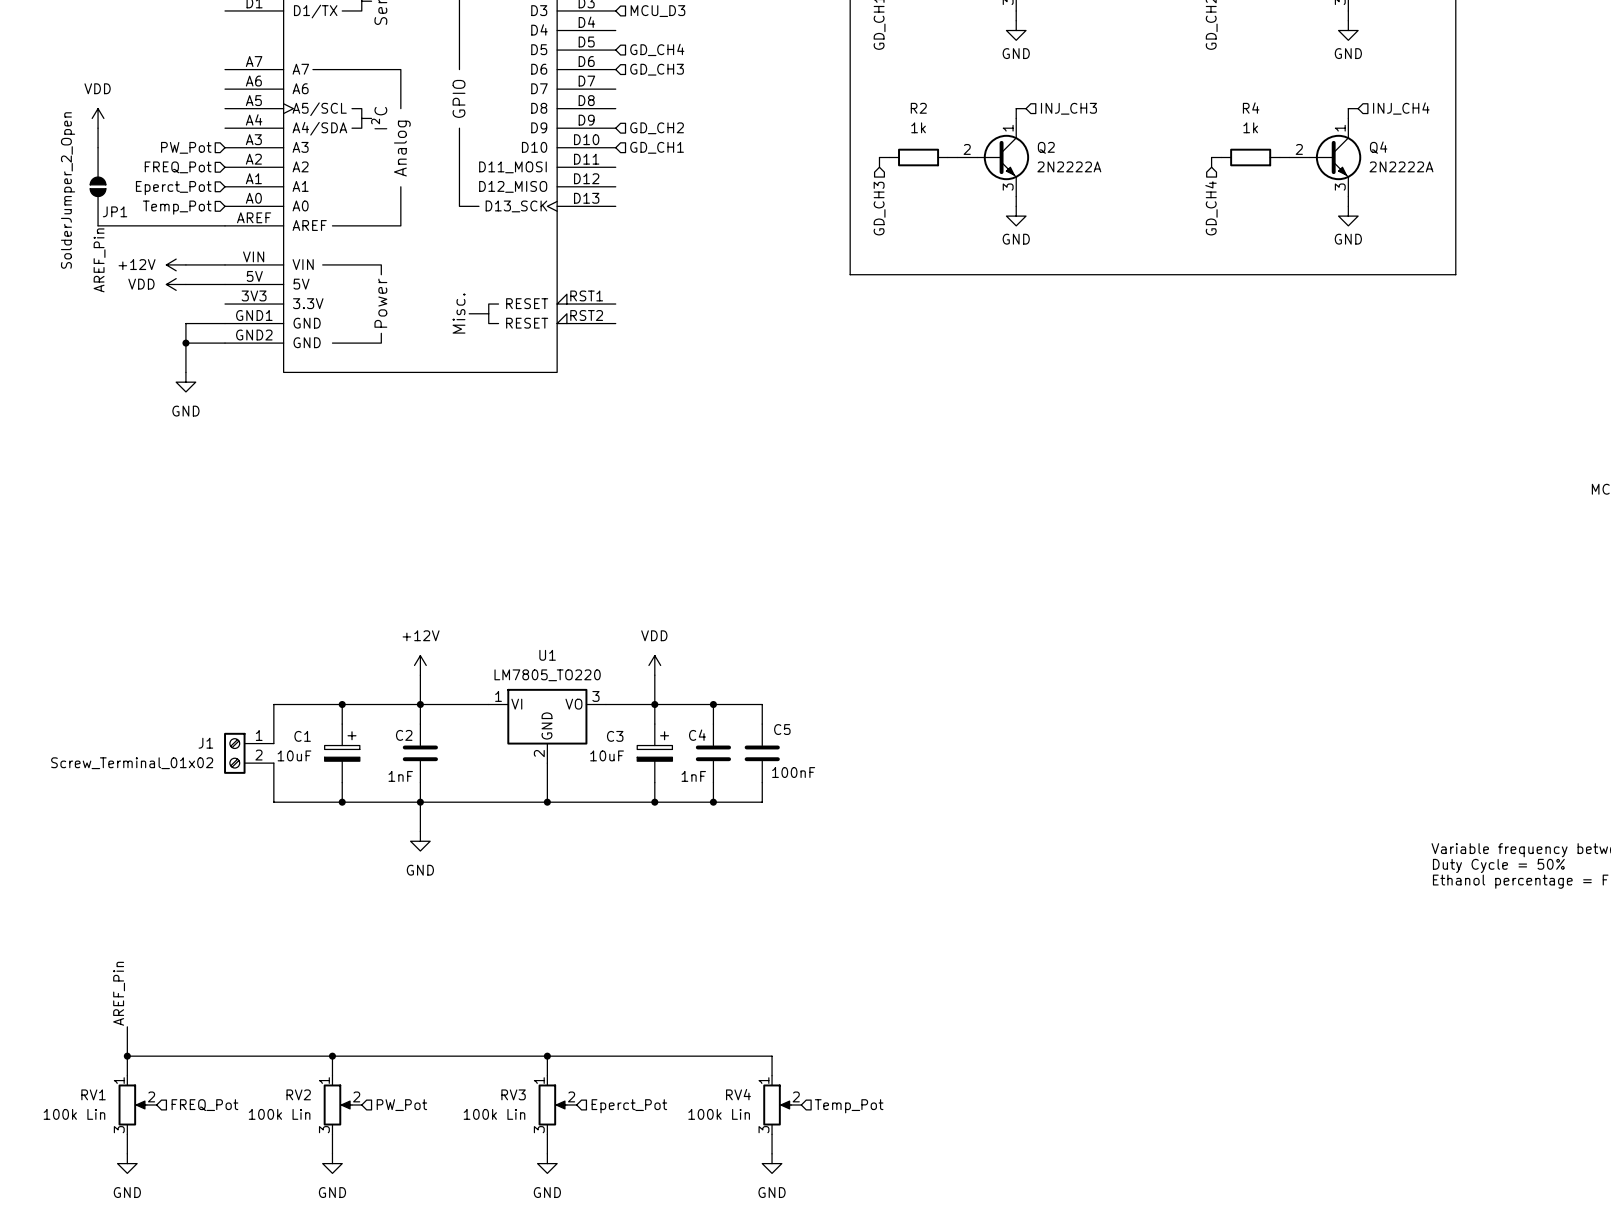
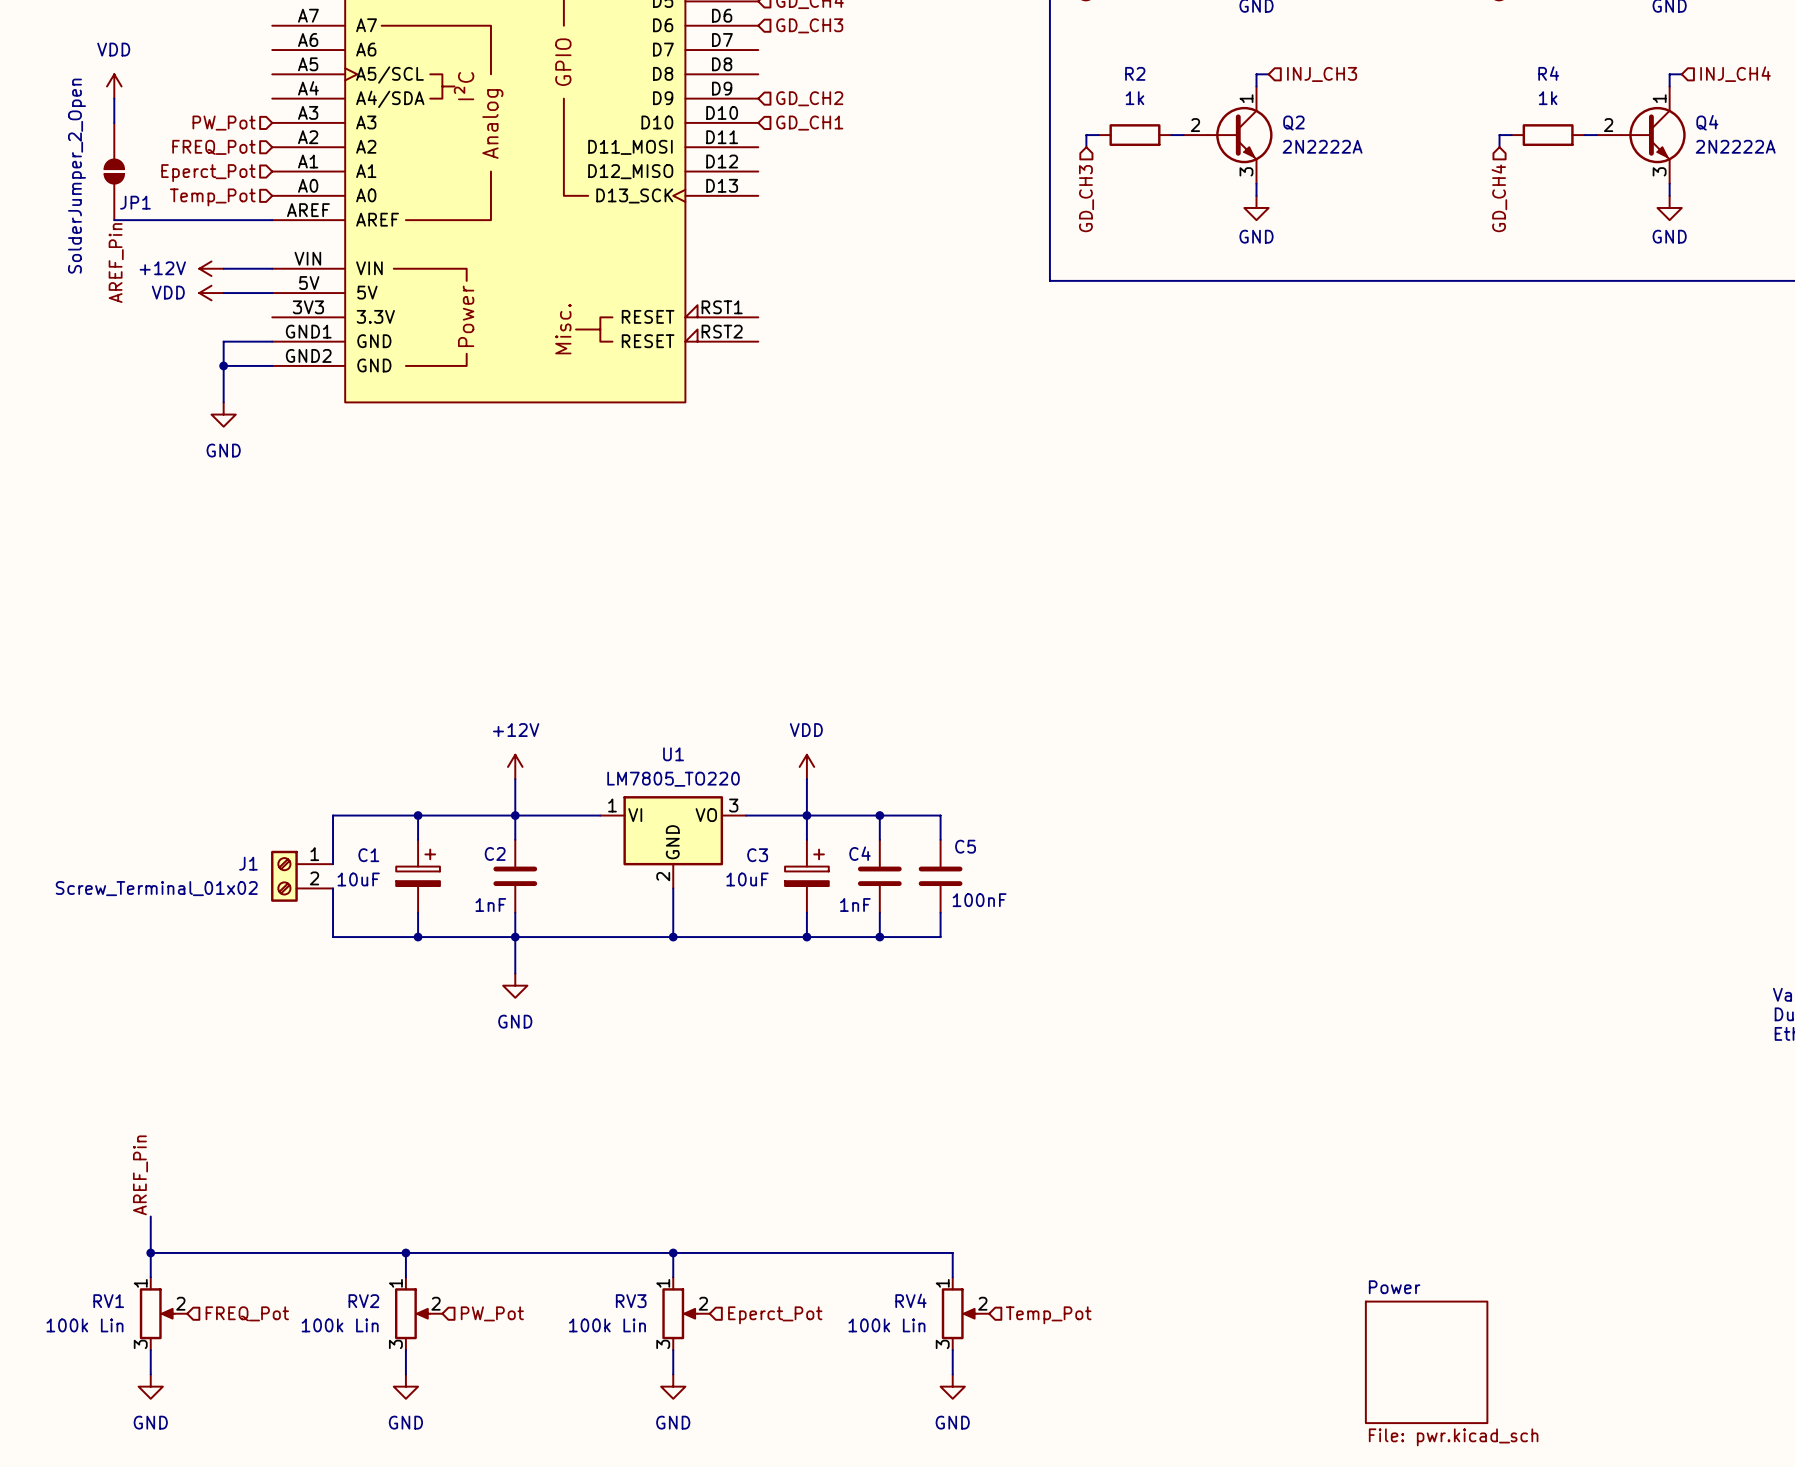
sheet Power: none -> File: pwr.kicad_sch (1426, 1362)

